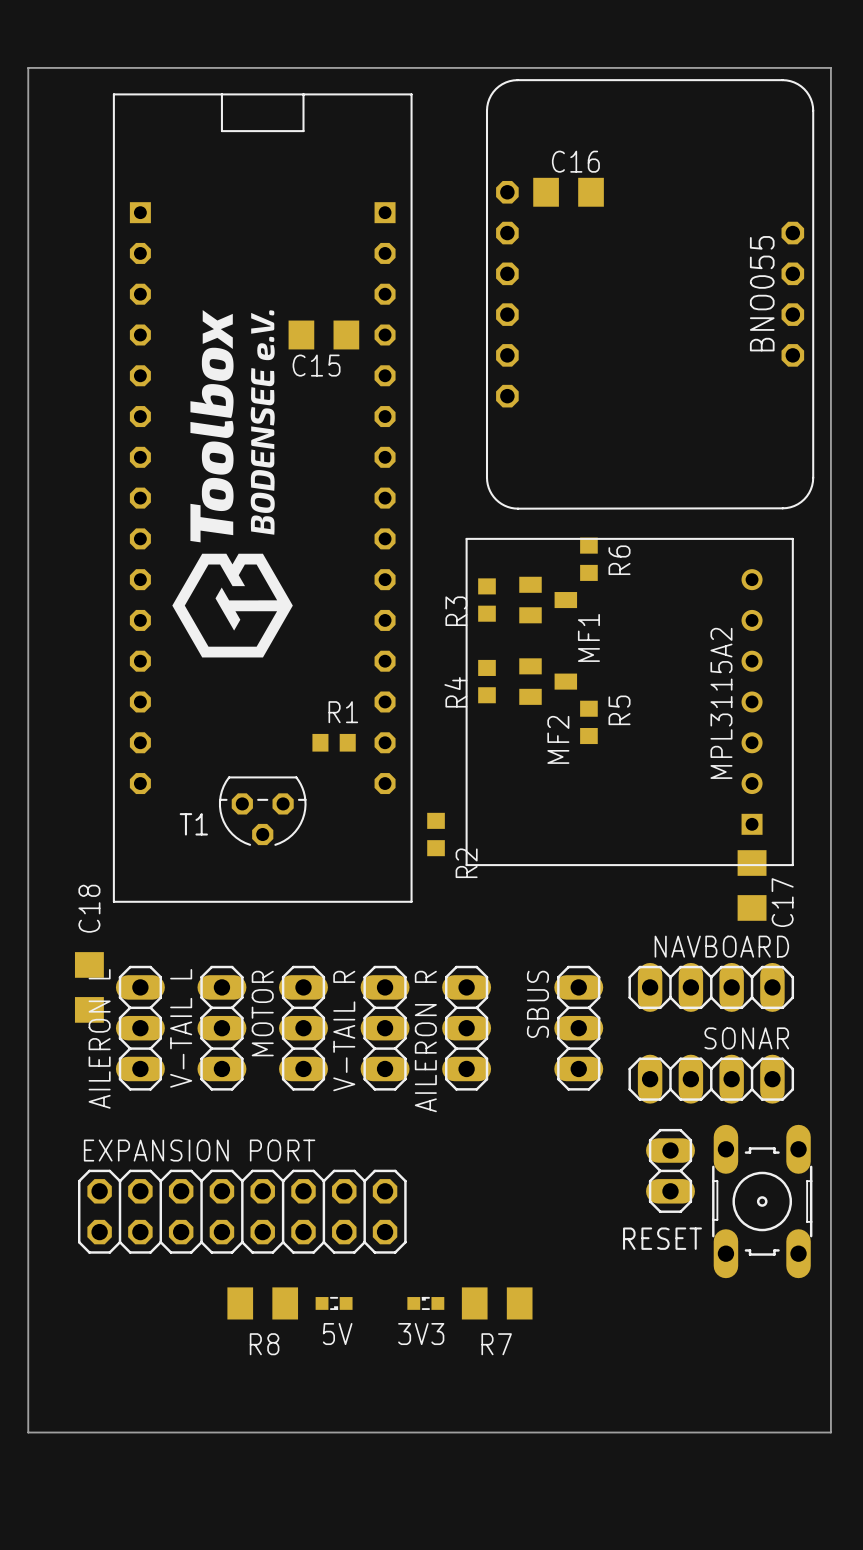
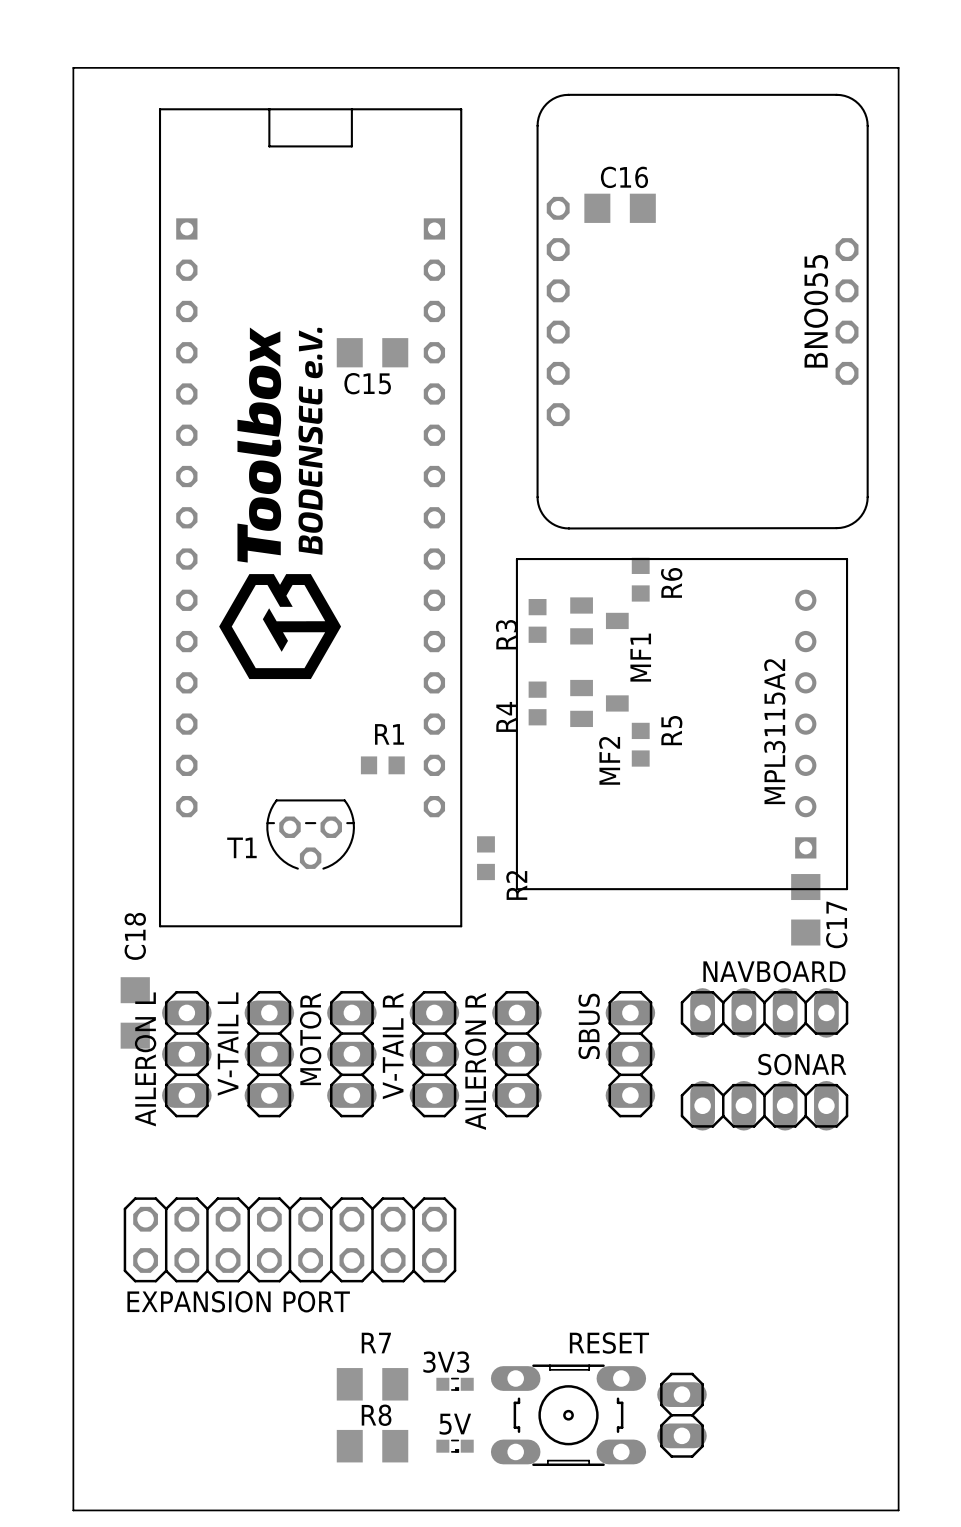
board edge: (28, 67) (830, 67) (830, 1432) (28, 1432) -> (73, 82) (73, 67) (898, 67) (898, 1510) (73, 1510) (73, 1463)
part value position: EXPANSION PORT (199, 1150) -> EXPANSION PORT (238, 1301)
part position: (670, 1170) -> (681, 1415)
part rotation: 0° (762, 1201) -> 90° clockwise (568, 1415)
part position: (762, 1201) -> (568, 1415)
part value position: RESET (662, 1238) -> RESET (609, 1343)
R8 position: (262, 1303) -> (372, 1446)
part position: (334, 1303) -> (455, 1446)
part rotation: 0° (425, 1303) -> 180° (455, 1384)
part position: (425, 1303) -> (455, 1384)
R7 position: (497, 1303) -> (372, 1384)
part value position: 5V (337, 1334) -> 5V (455, 1424)
R8 name position: R8 (264, 1344) -> R8 (376, 1415)
R7 name position: R7 (496, 1344) -> R7 (376, 1343)

